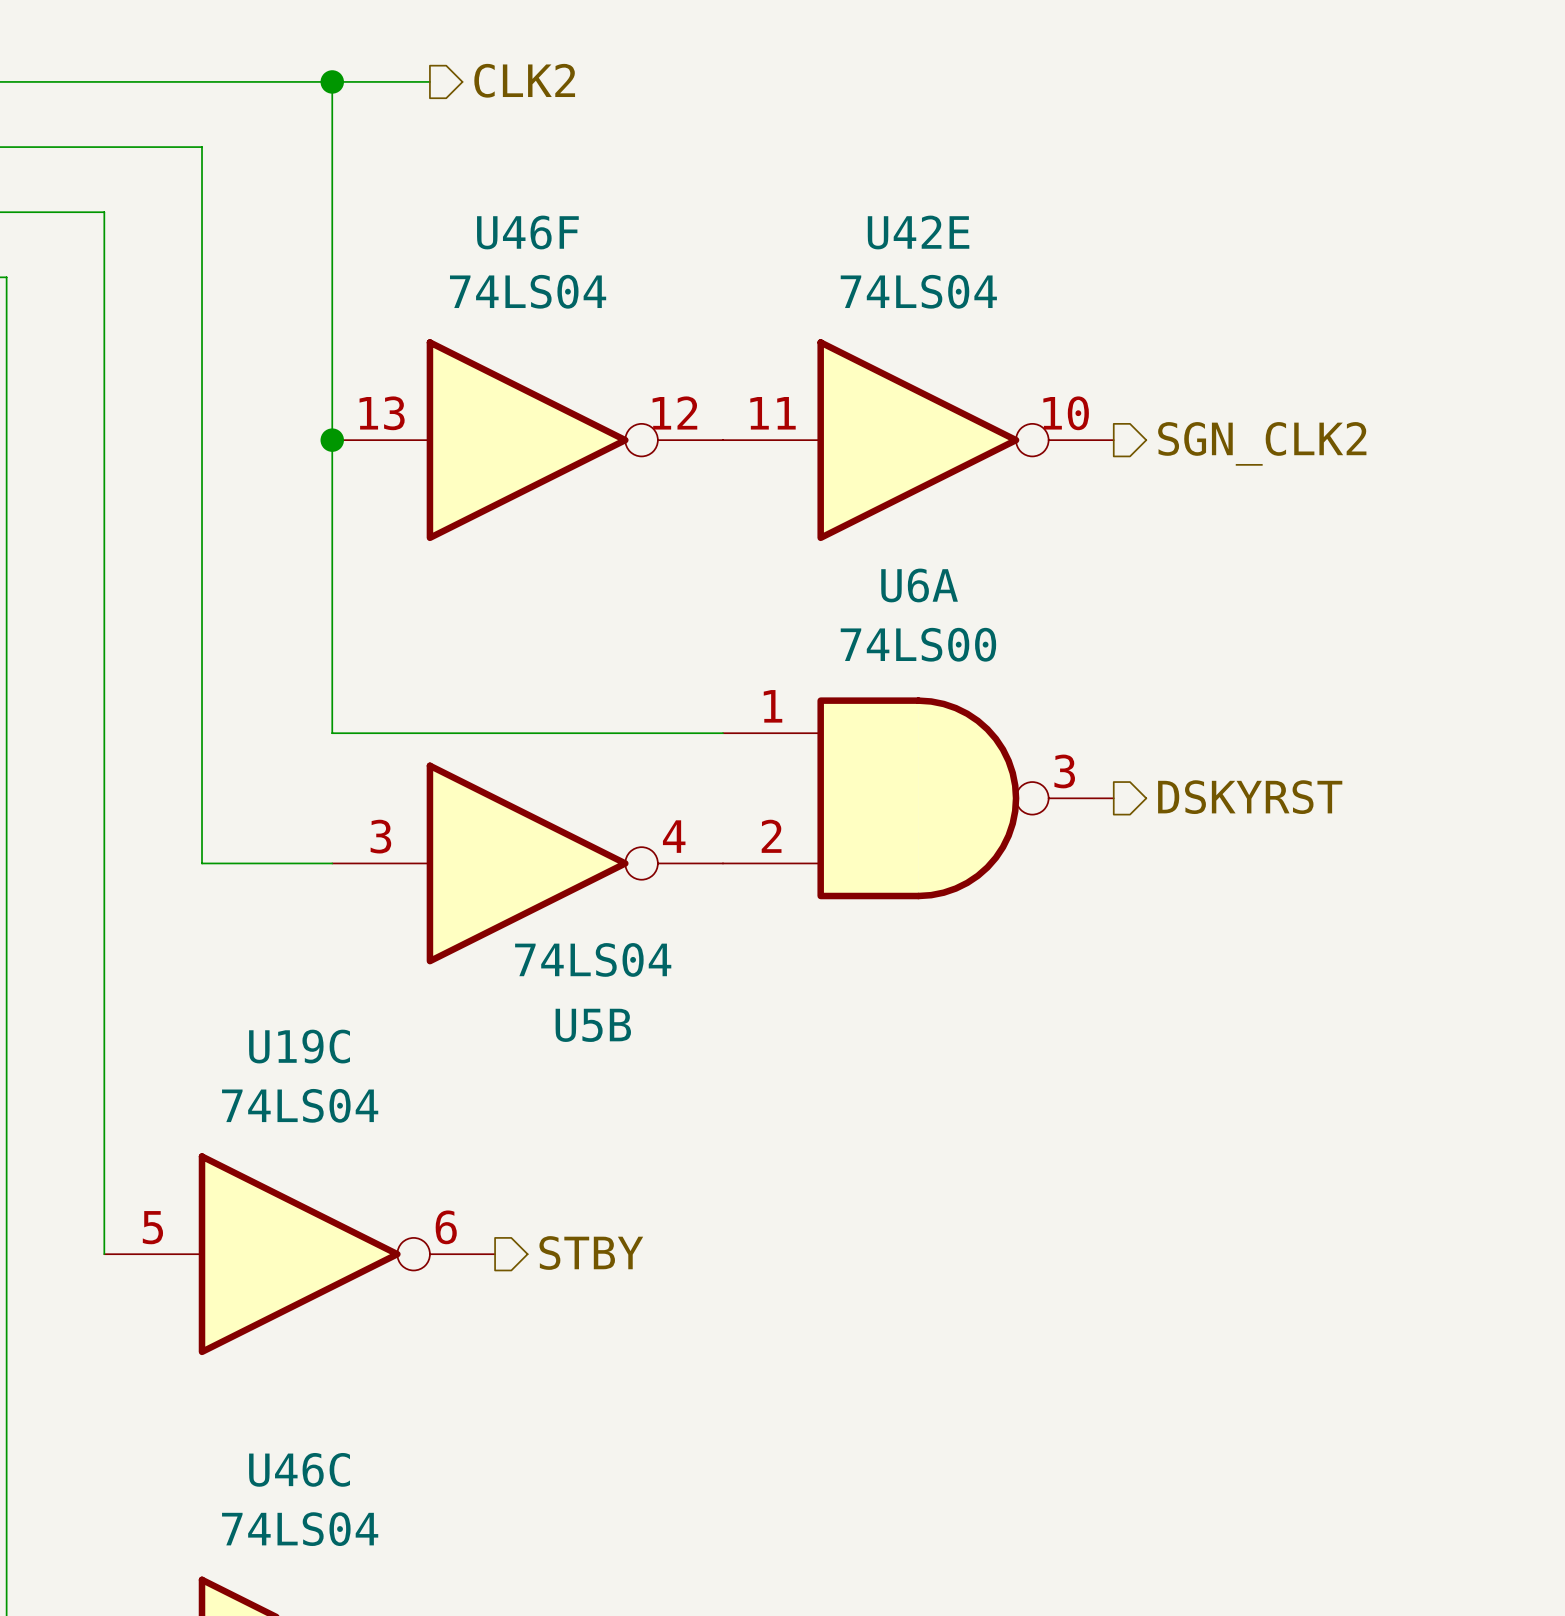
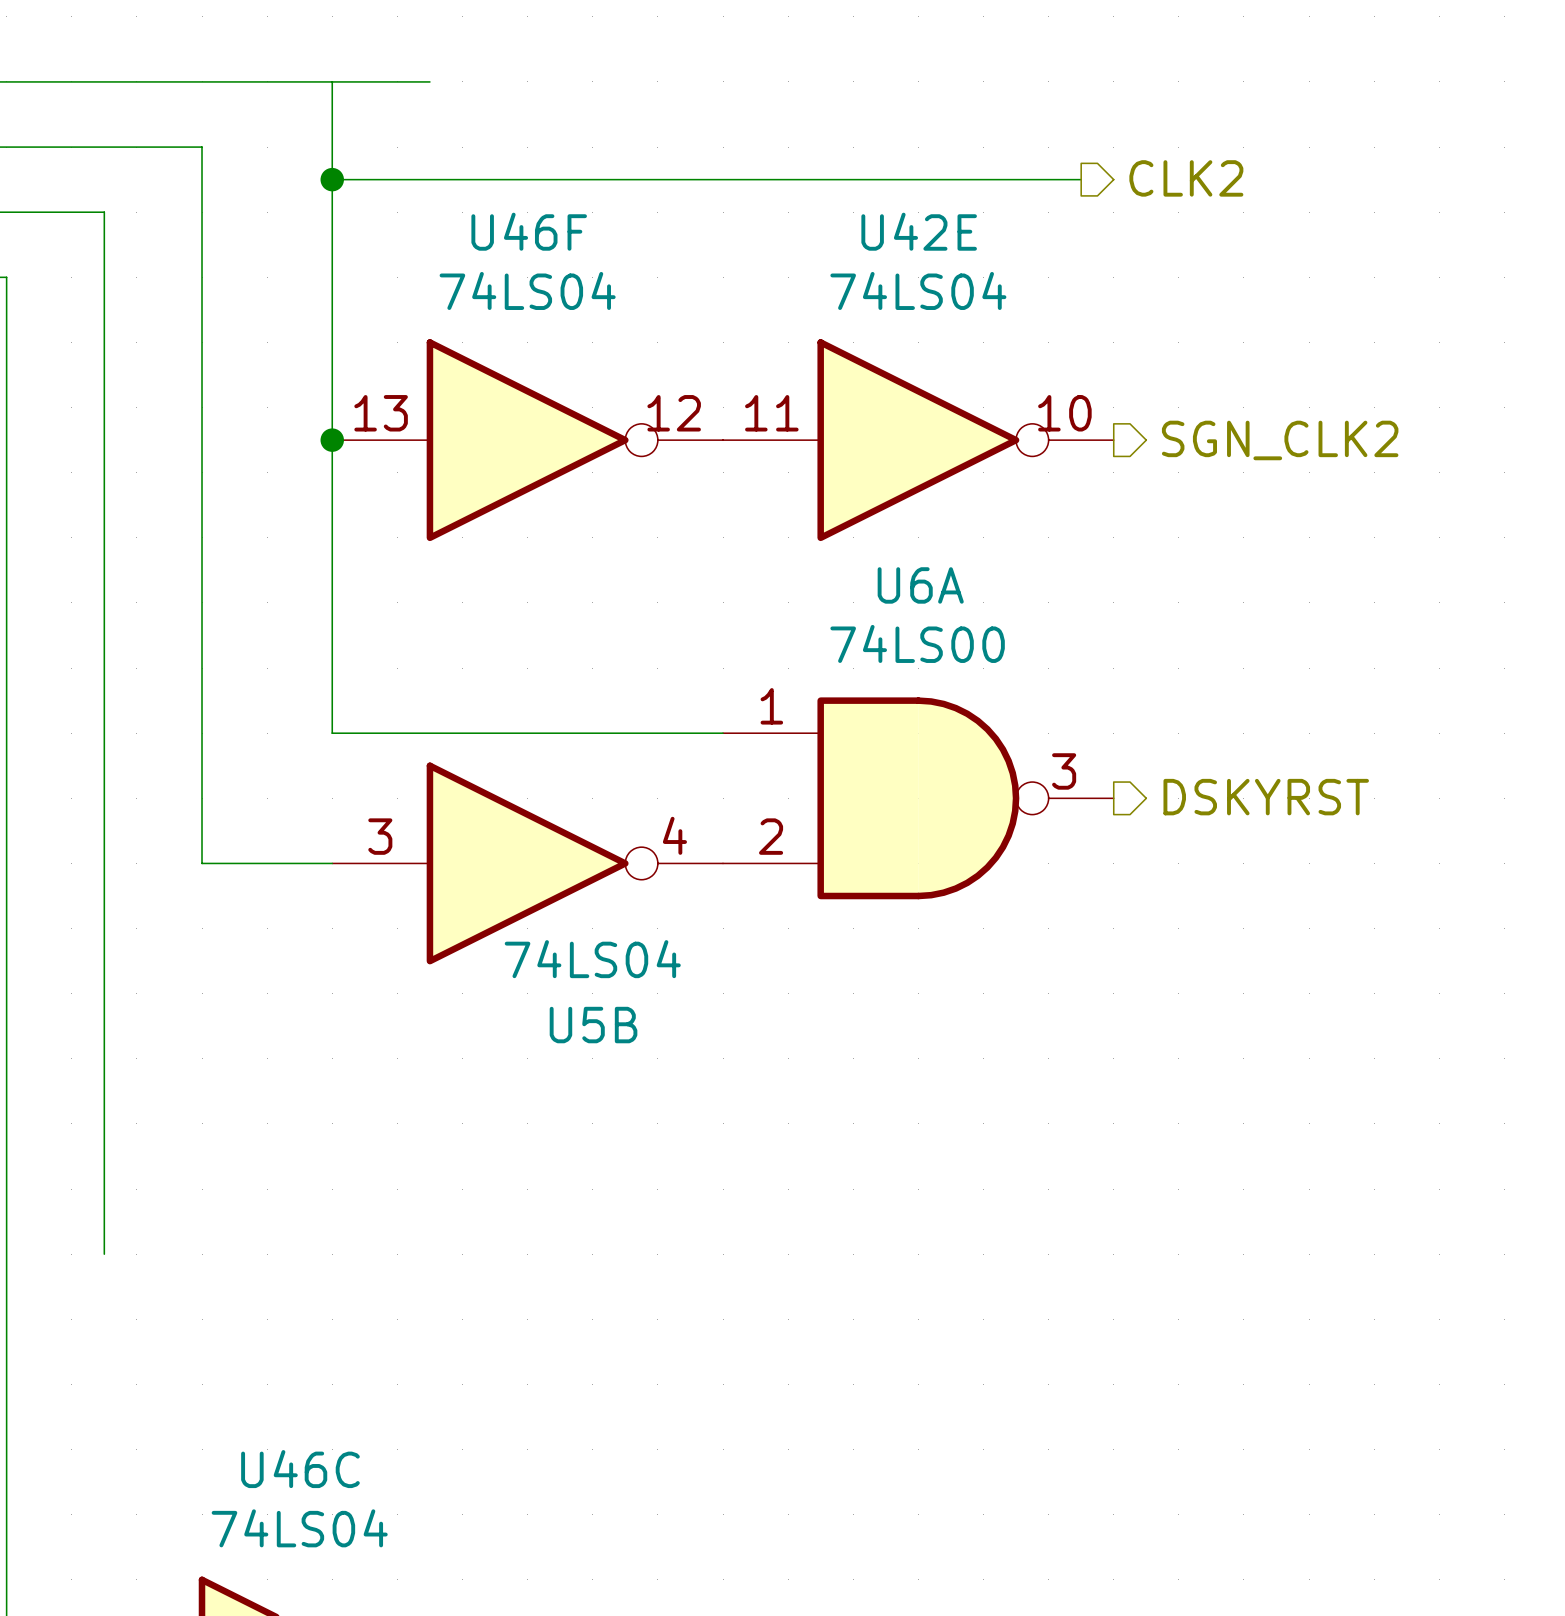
hierarchical label: CLK2 (524, 80) -> none
junction position: (332, 81) -> (332, 179)
hierarchical label: none -> CLK2 (1186, 178)
wire: none -> (332, 179) (1081, 179)
hierarchical label: STBY (591, 1253) -> none
U19C: 74LS04 (299, 1254) -> none

